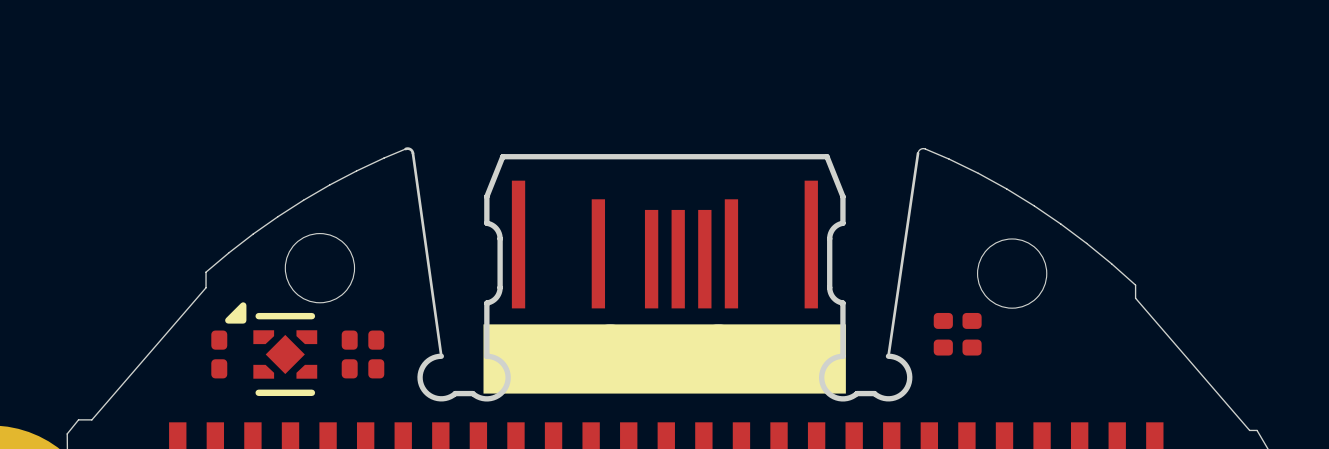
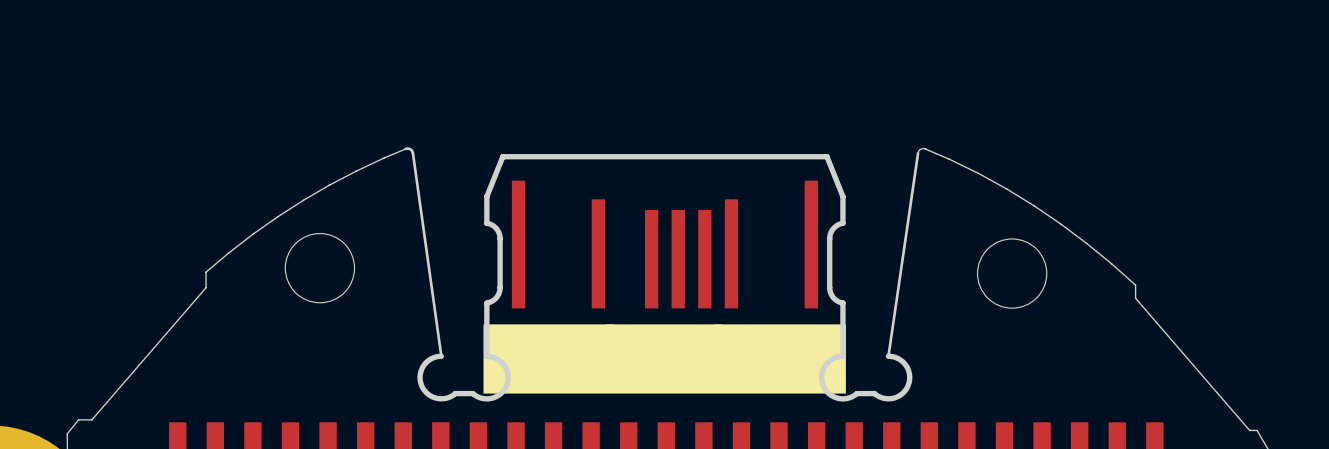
part: (957, 320) -> none
part: (957, 347) -> none
part: (271, 349) -> none
part: (219, 354) -> none
part: (349, 354) -> none
part: (376, 354) -> none

